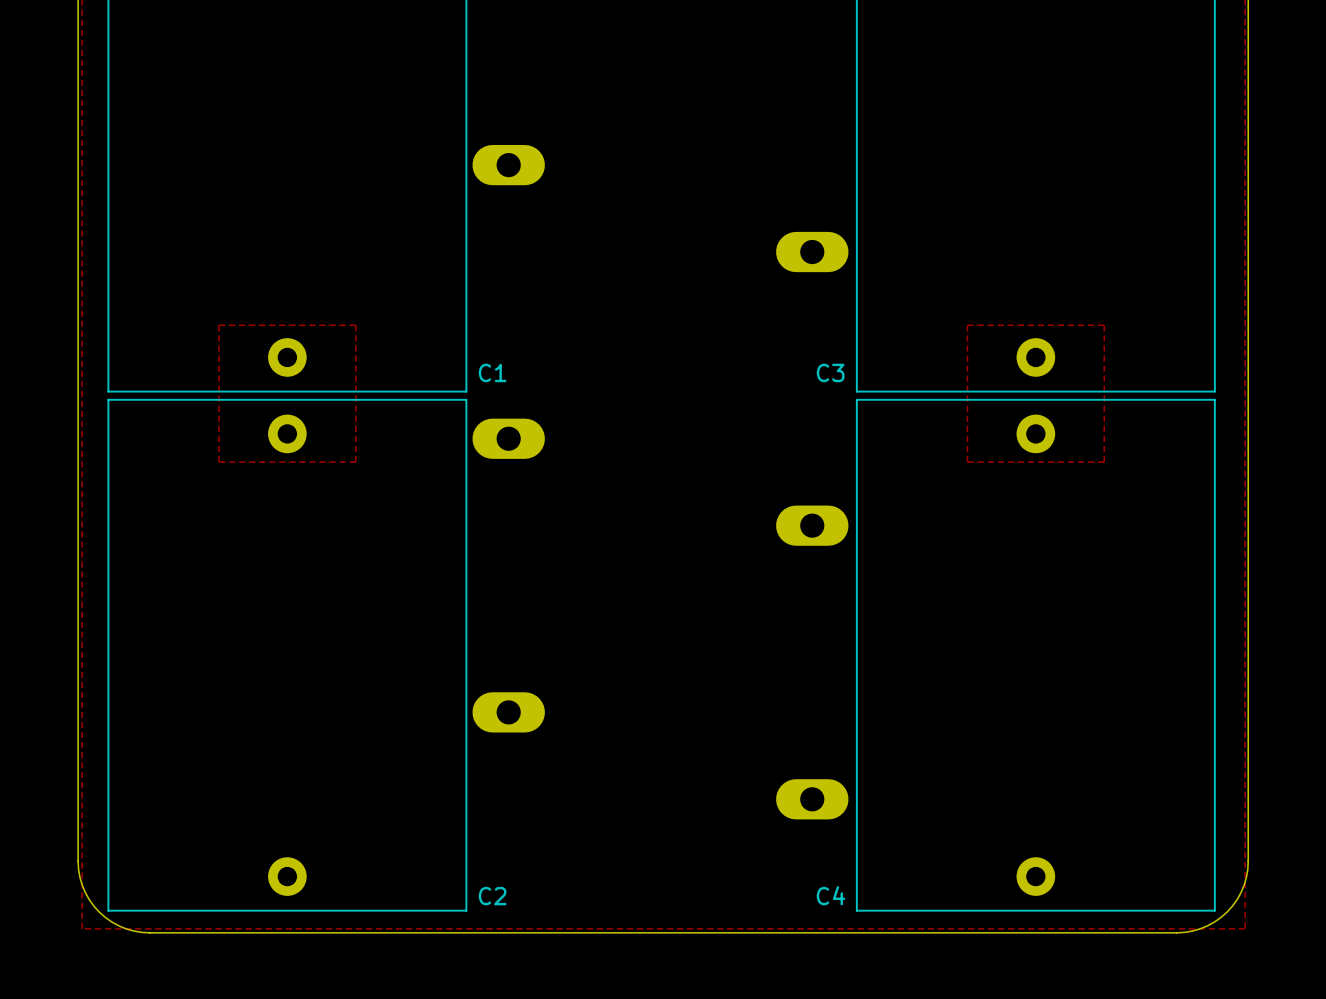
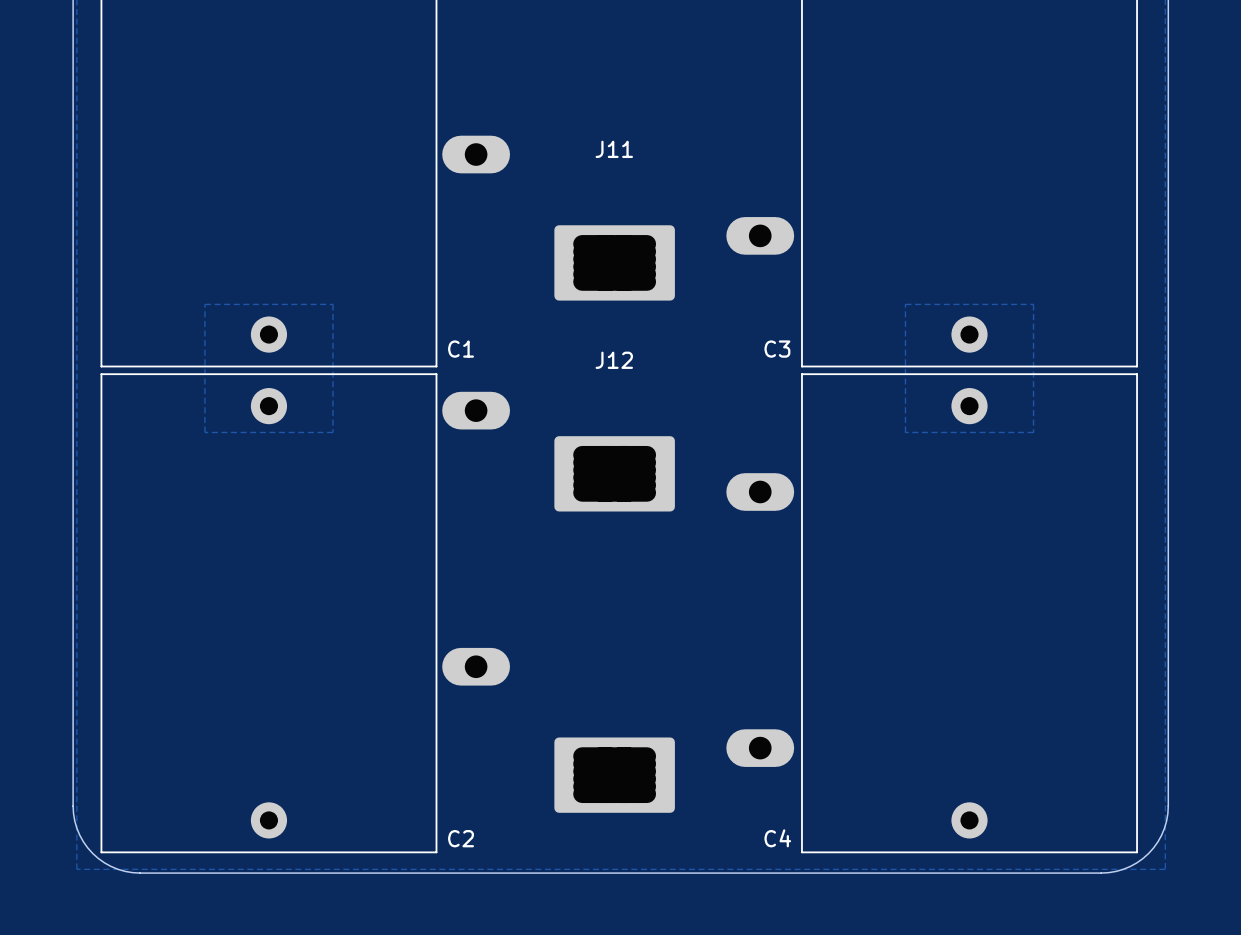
J11: none -> (614, 262)
J12: none -> (614, 473)
part: none -> (614, 775)

